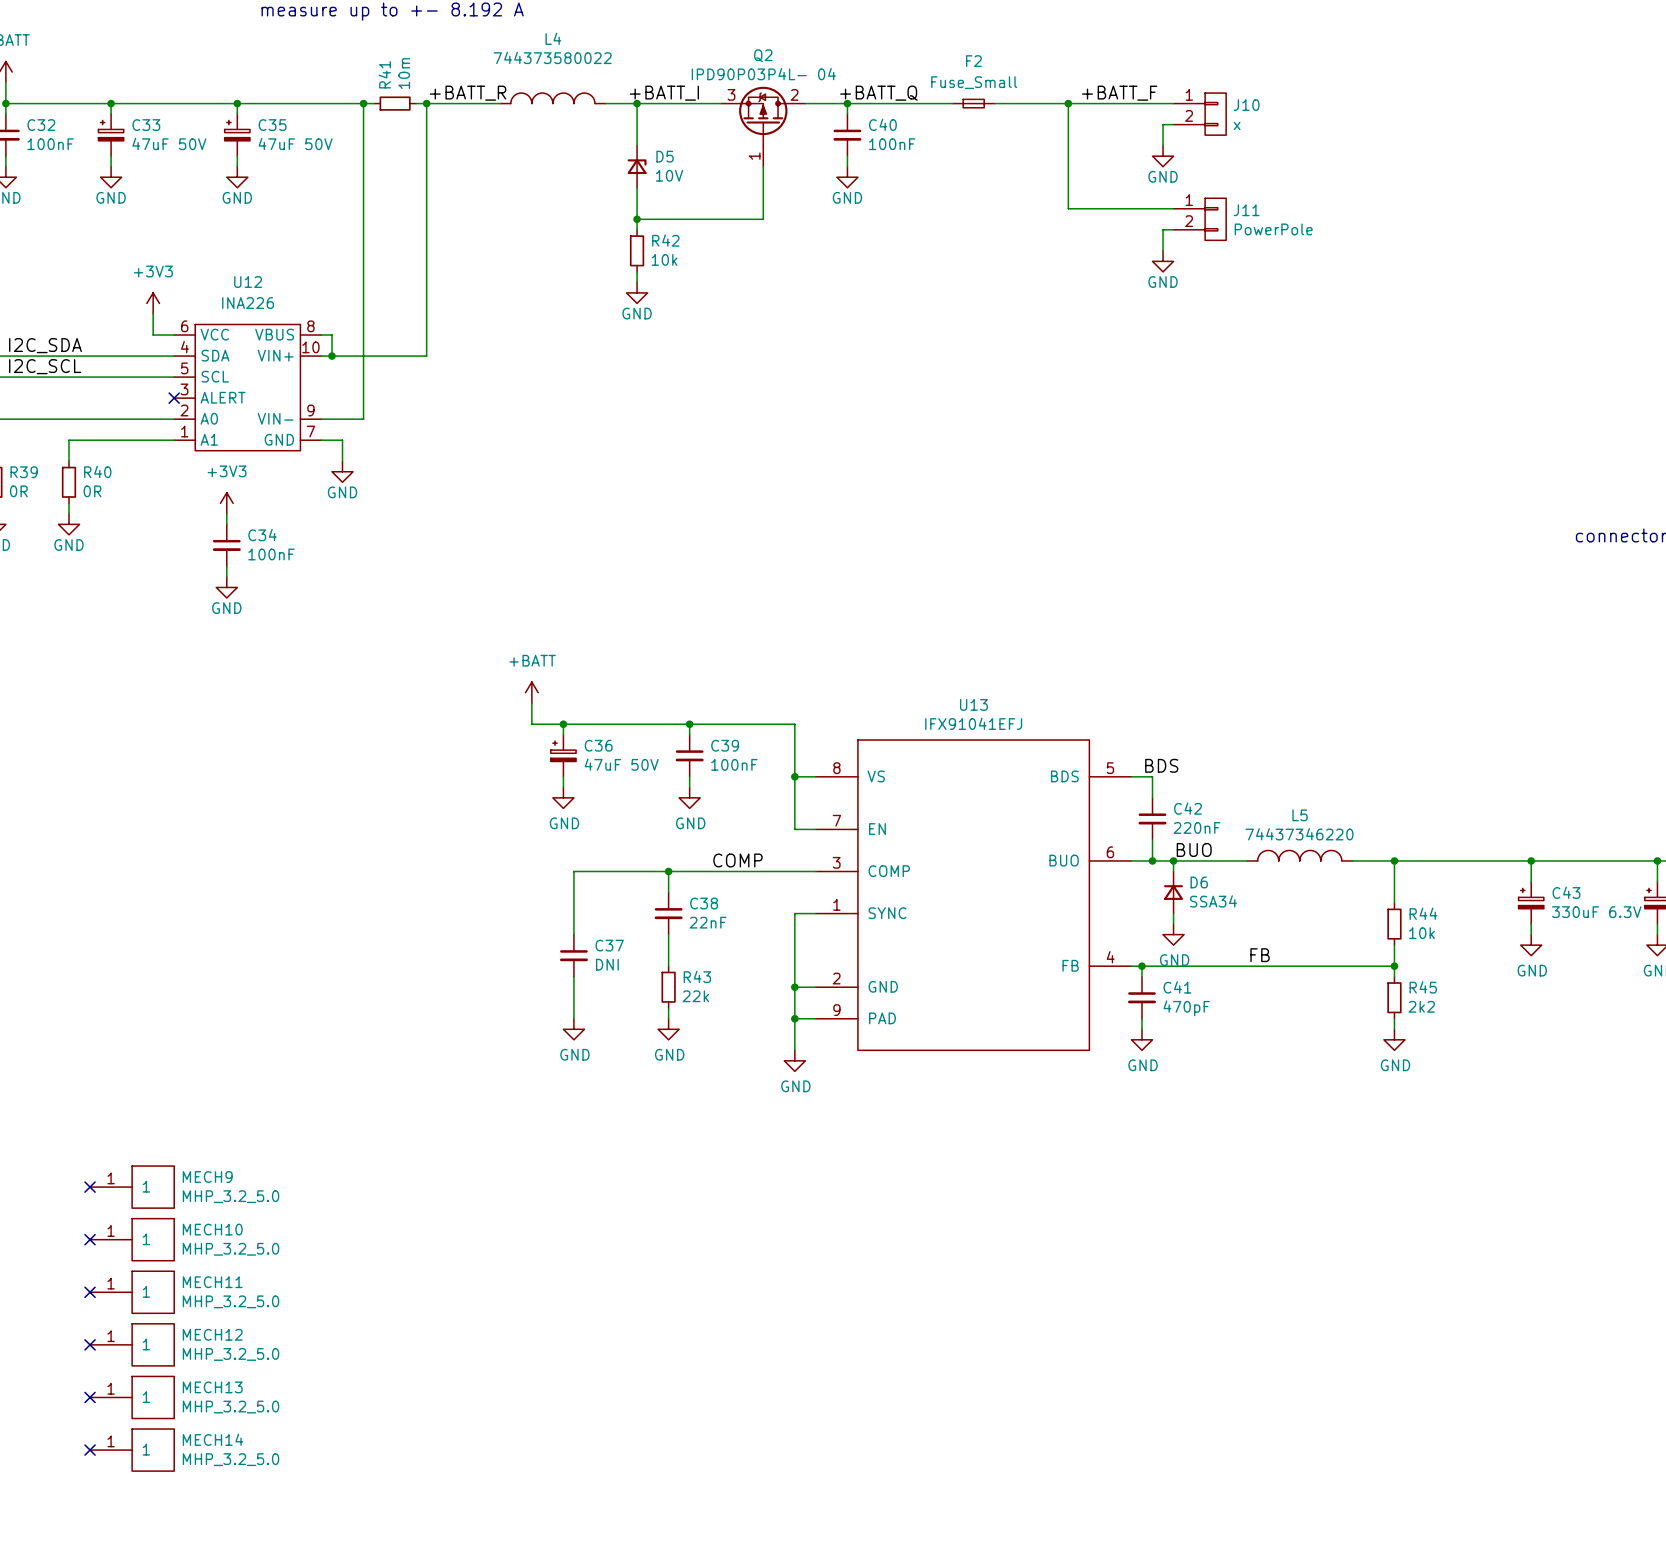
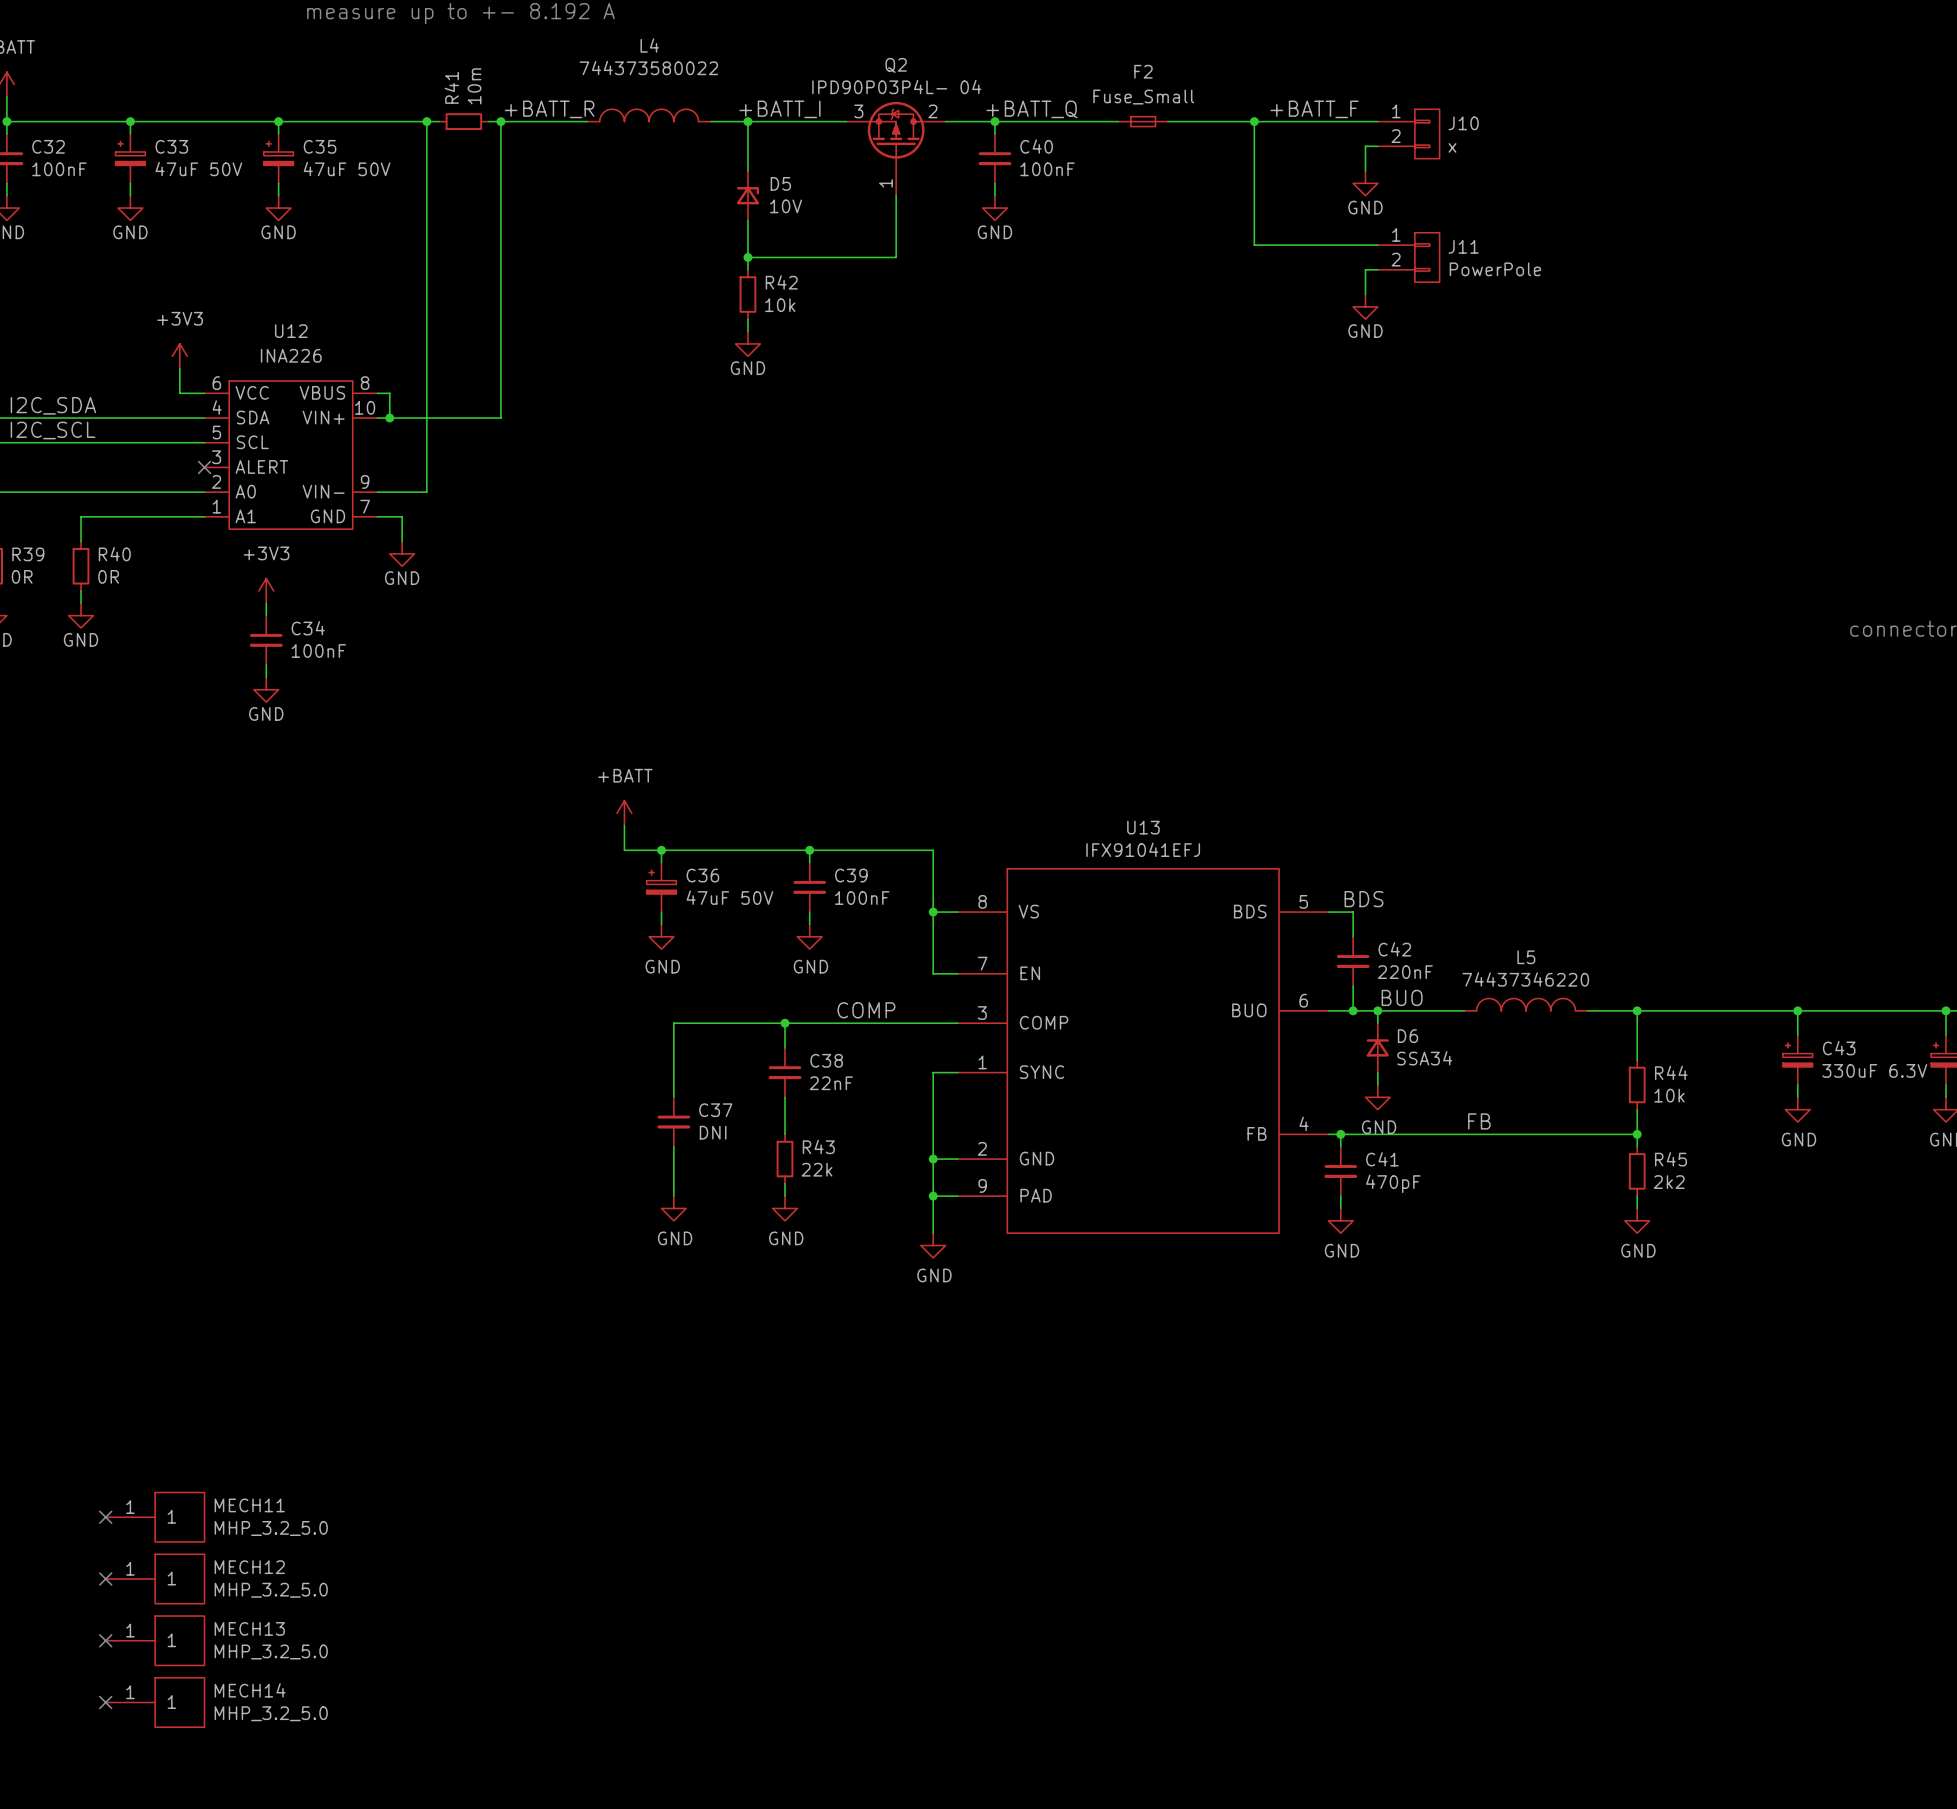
no-connect mark: (90, 1187) -> none
MECH9: MHP_3.2_5.0 (132, 1187) -> none
no-connect mark: (90, 1239) -> none
MECH10: MHP_3.2_5.0 (132, 1239) -> none

